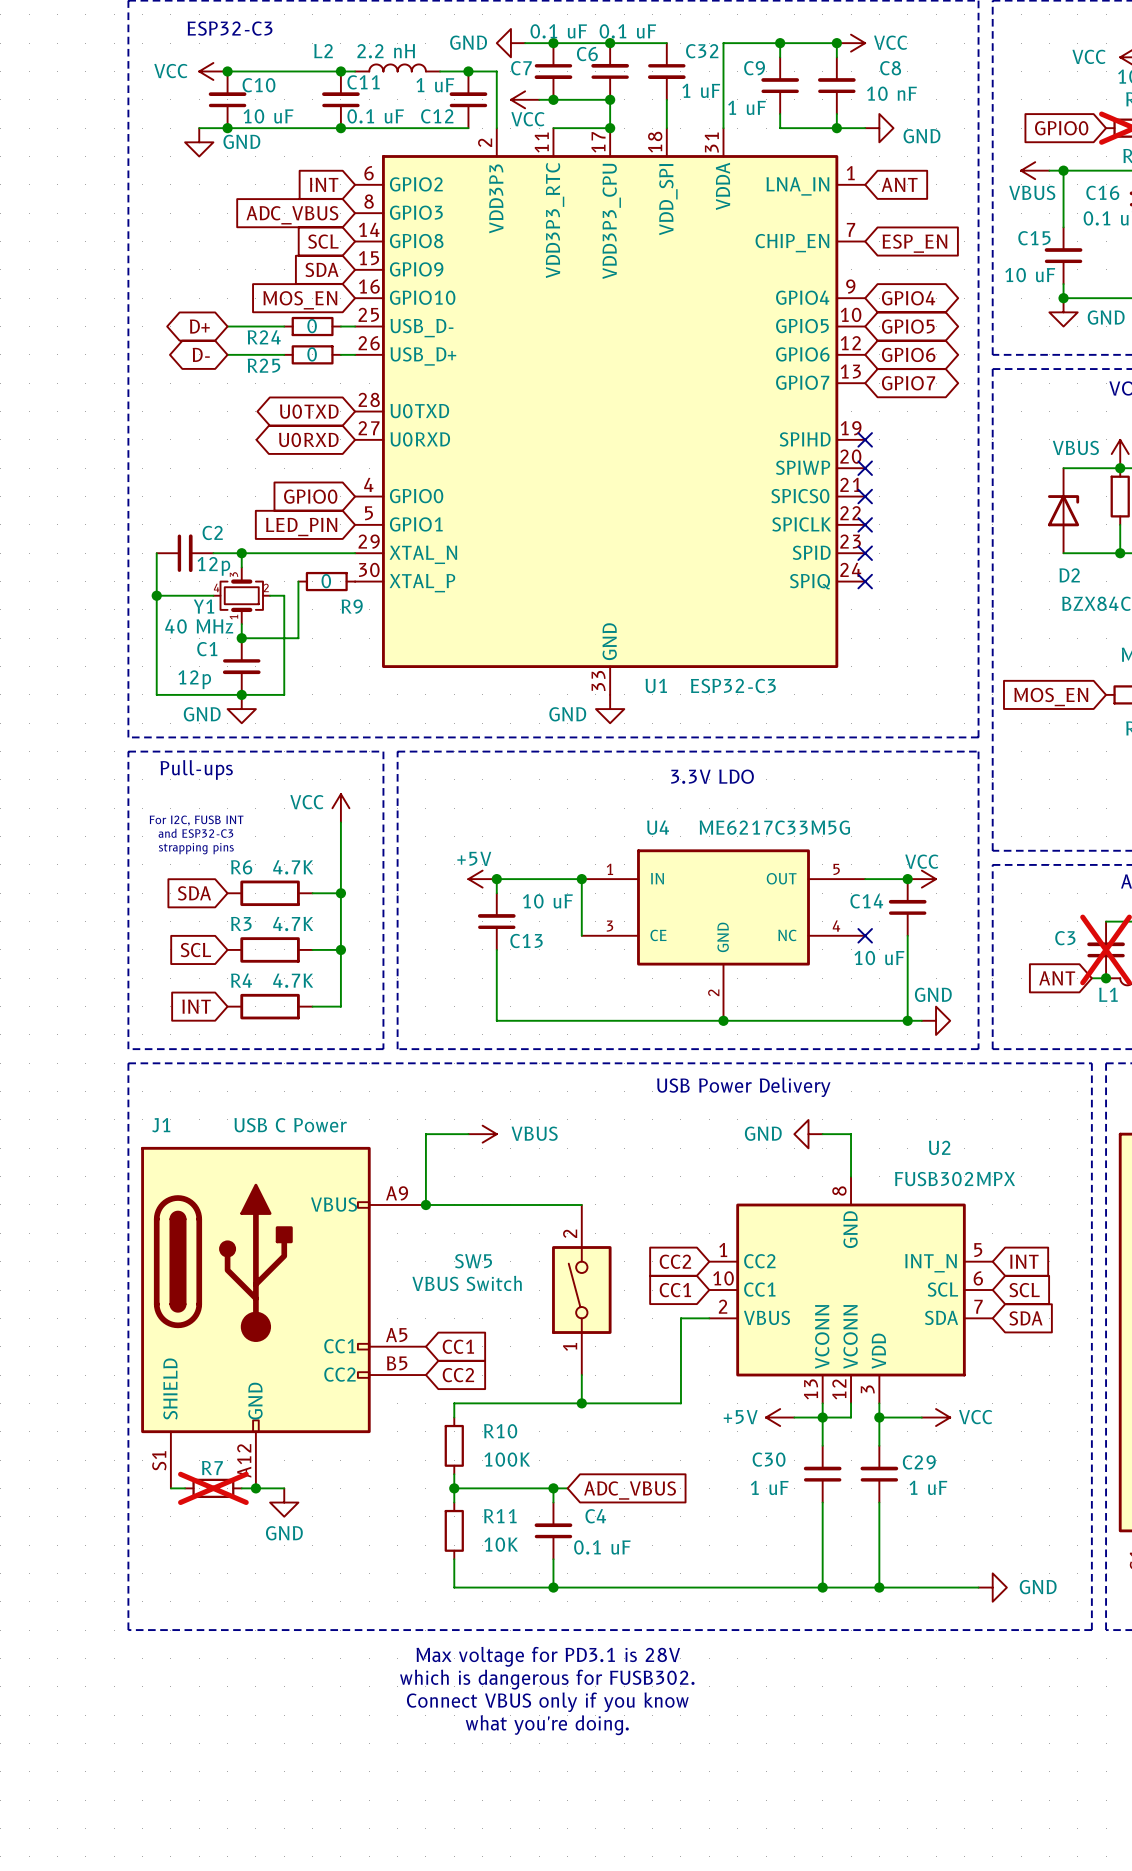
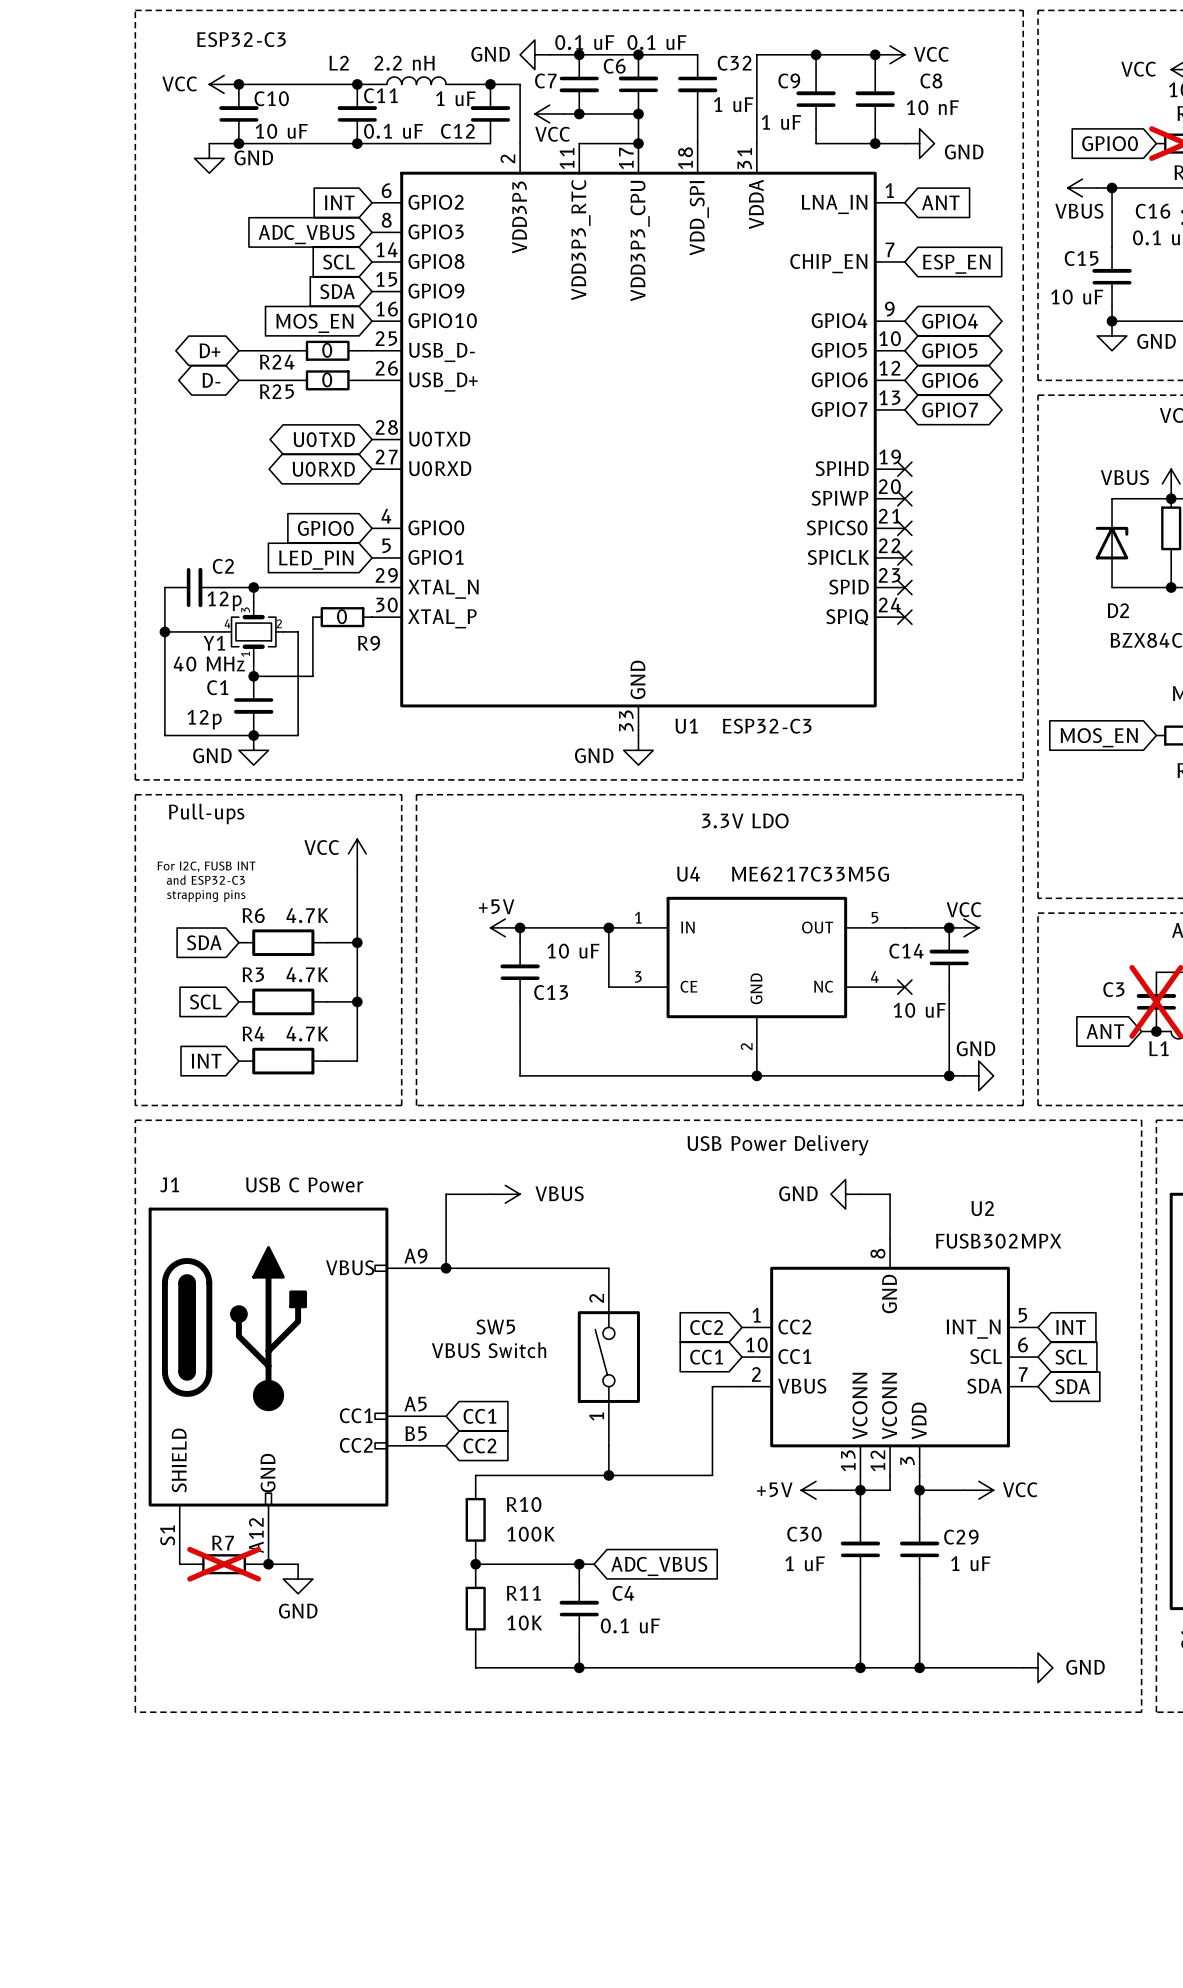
text: Max voltage for PD3.1 is 28V (548, 1656) -> none
text: which is dangerous for FUSB302. (547, 1679) -> none
text: Connect VBUS only if you know (547, 1702) -> none
text: what you're doing. (547, 1725) -> none

